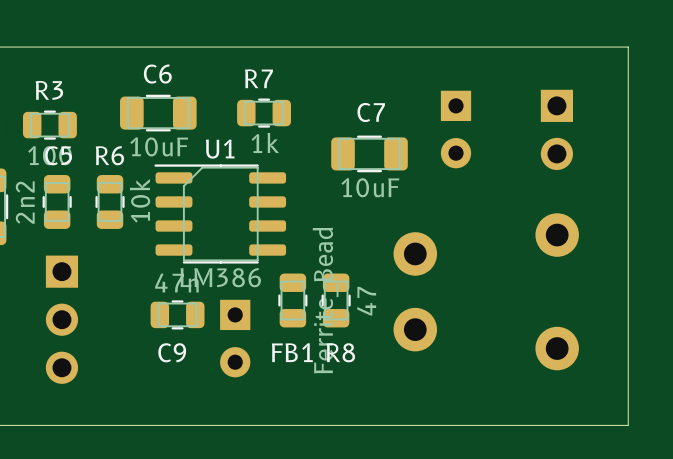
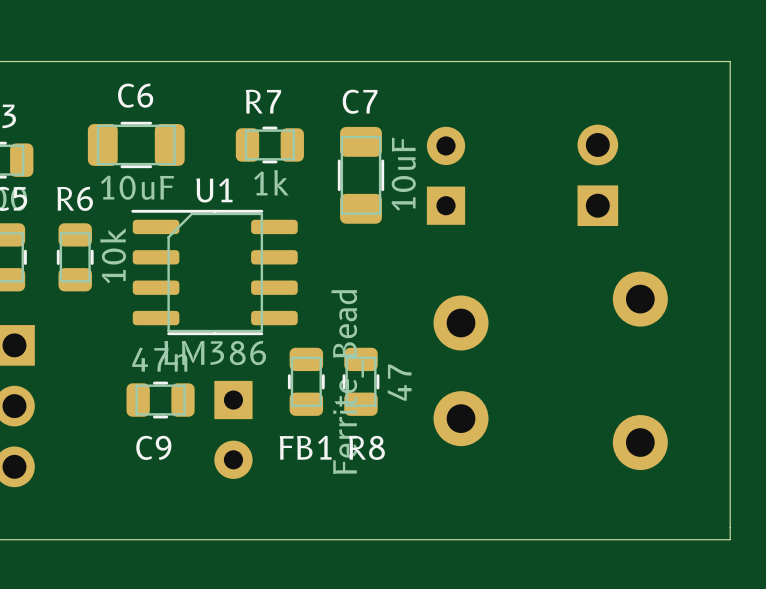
part rotation: 0° (456, 129) -> 180° (446, 175)
part position: (456, 129) -> (446, 175)
part rotation: 0° (556, 129) -> 180° (597, 175)
C7 rotation: 0° (369, 153) -> 90° clockwise (360, 175)
C7 value position: 10uF (370, 187) -> 10uF (403, 174)

